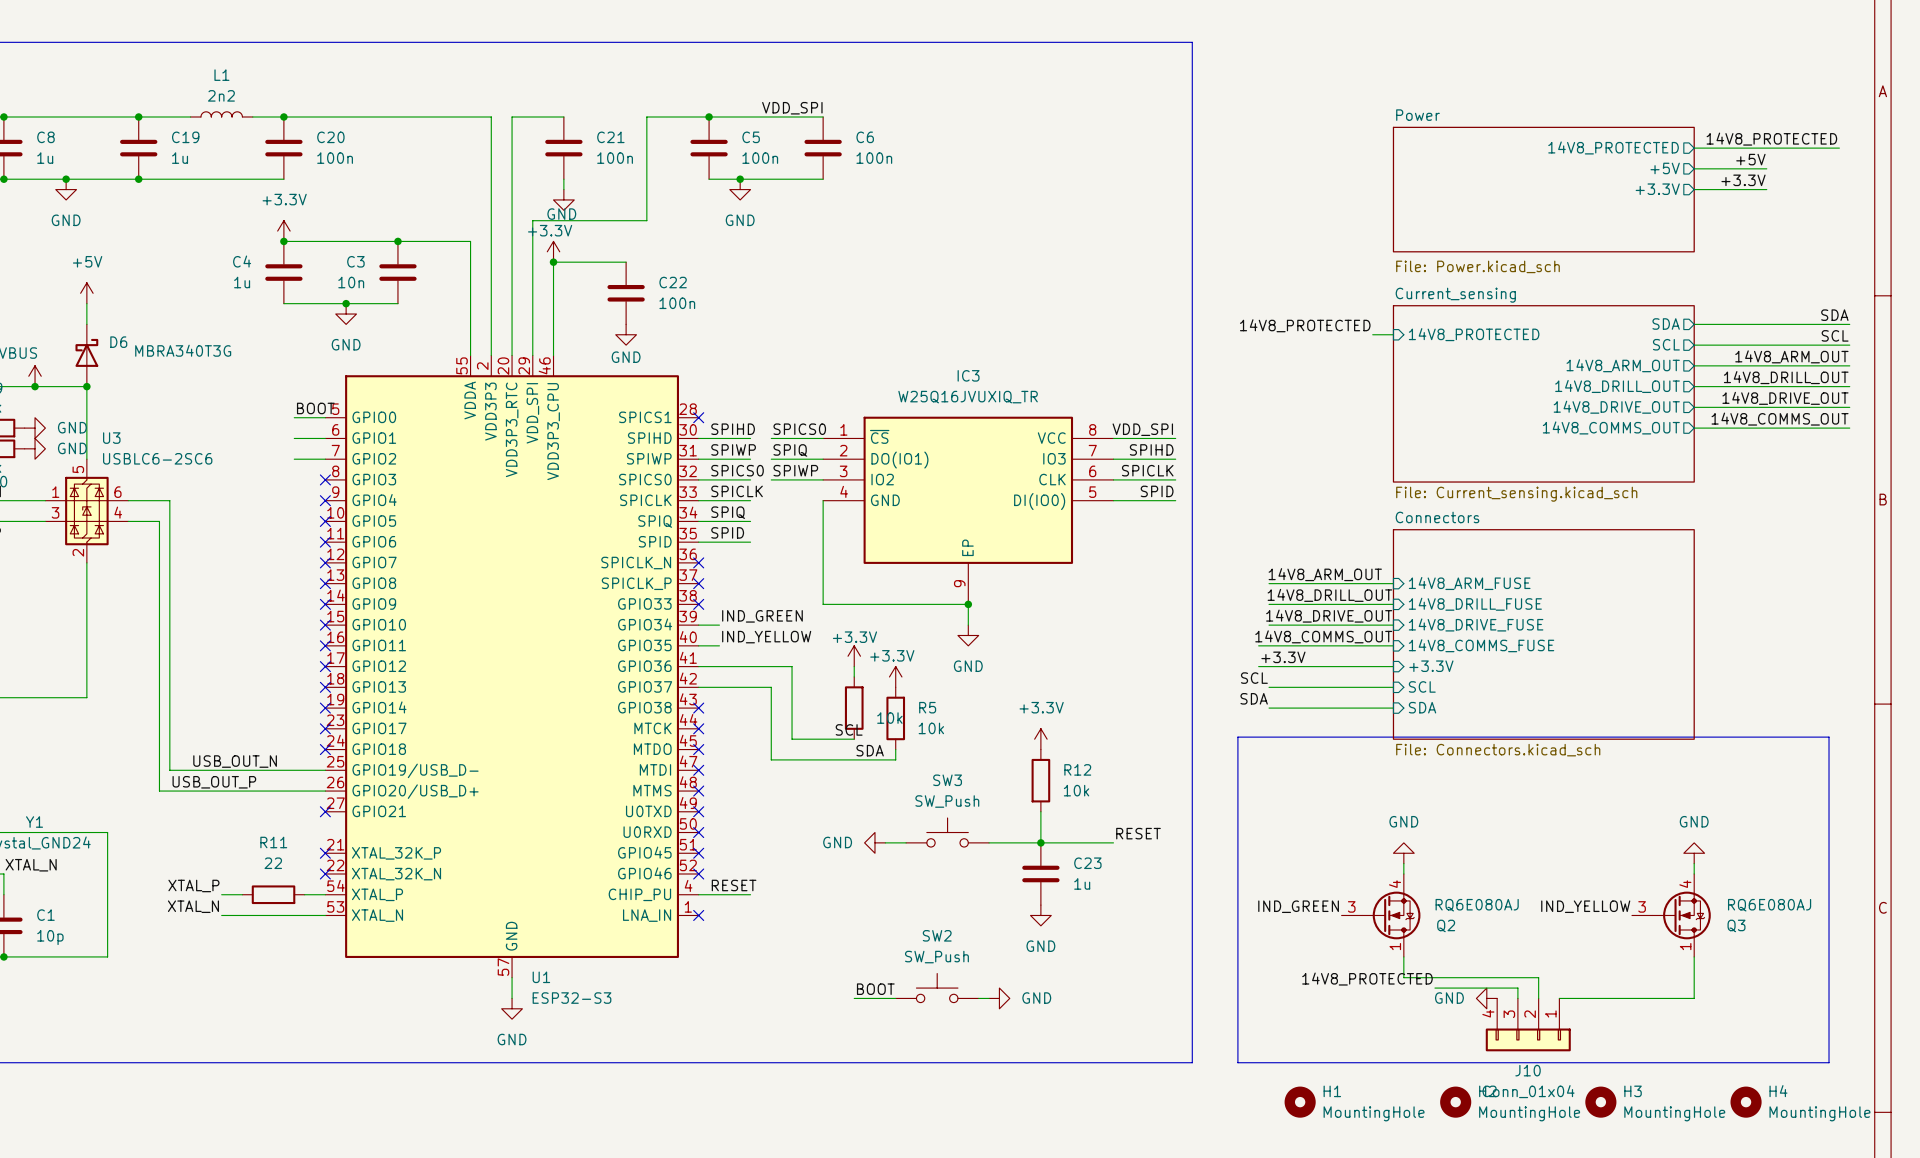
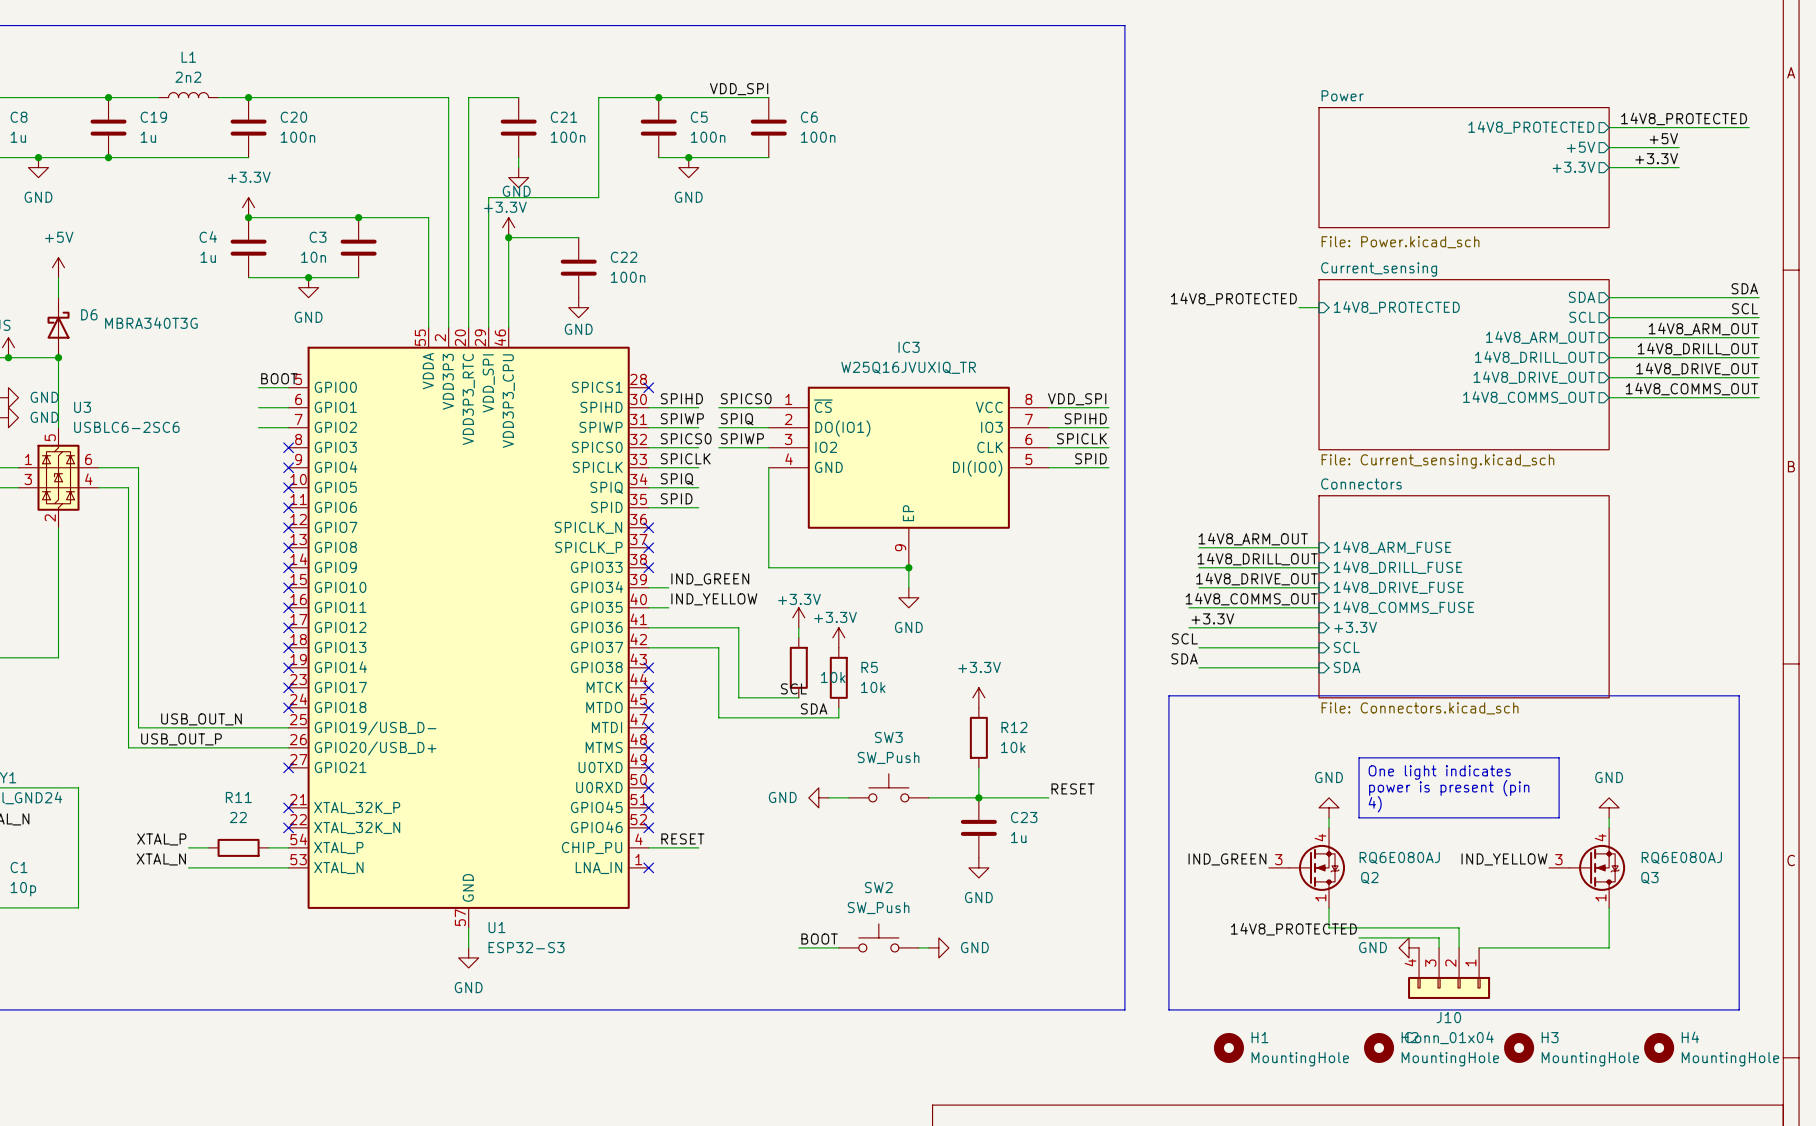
line: none -> (1359, 757) (1559, 757) (1559, 817) (1359, 817) (1359, 757)
text: none -> One light indicates (1439, 772)
text: none -> power is present (pin (1449, 788)
text: none -> 4) (1375, 804)

